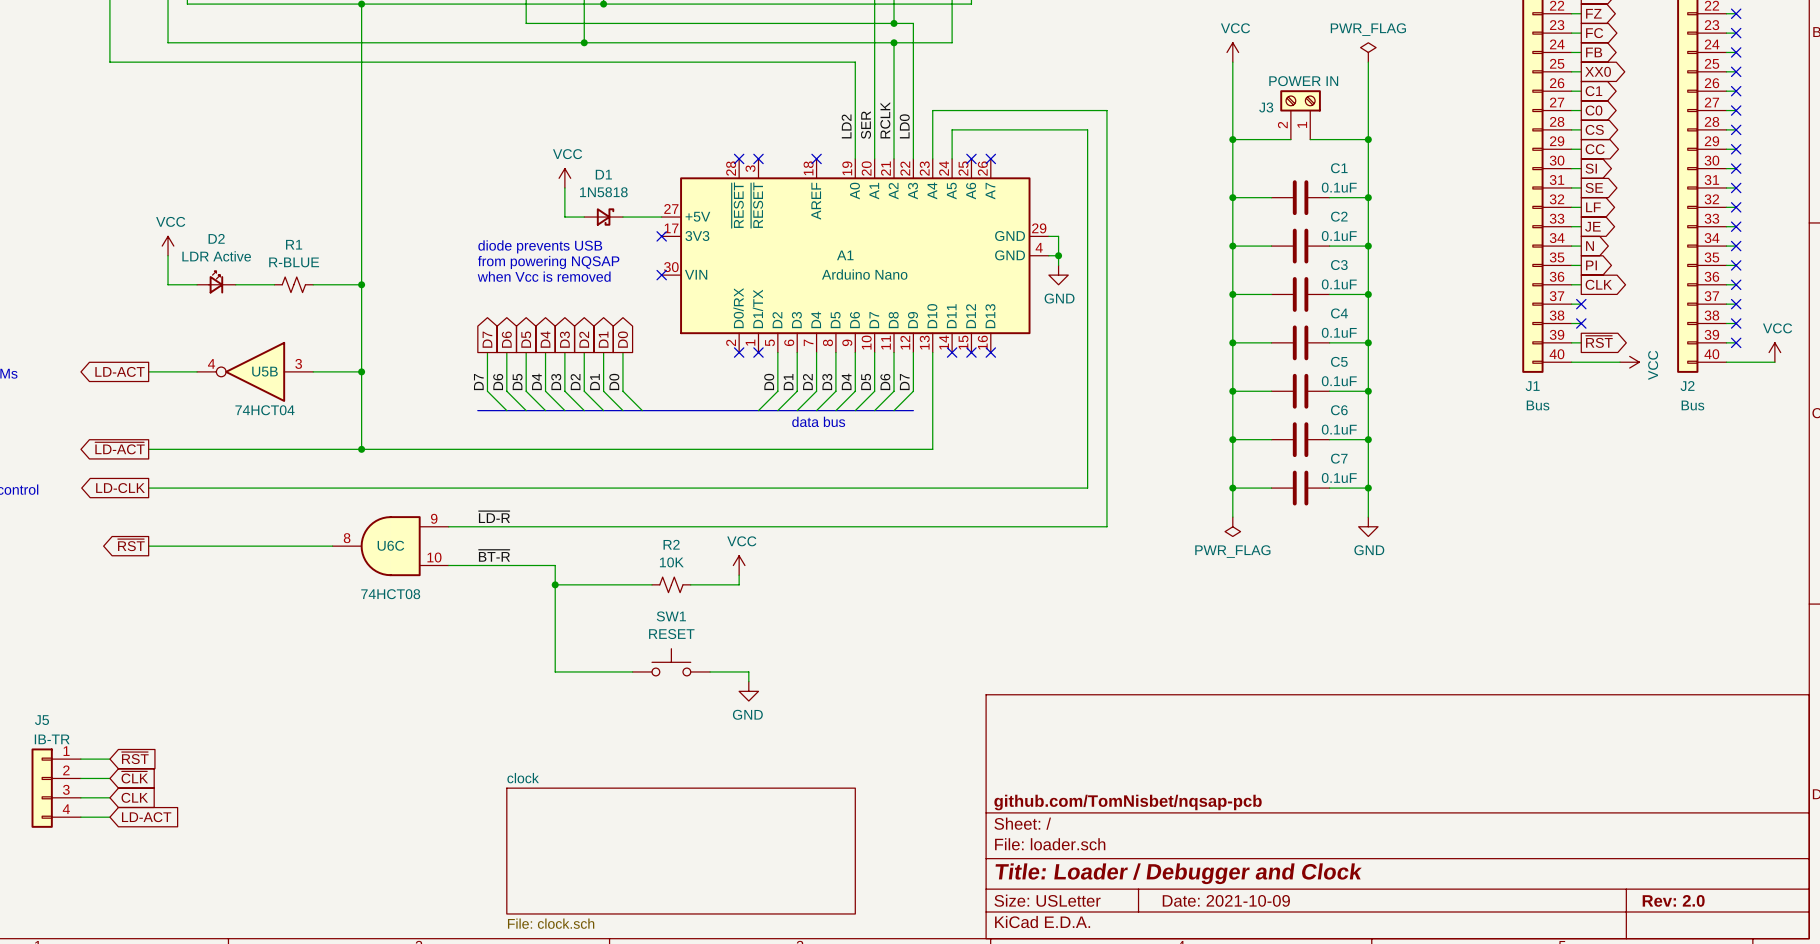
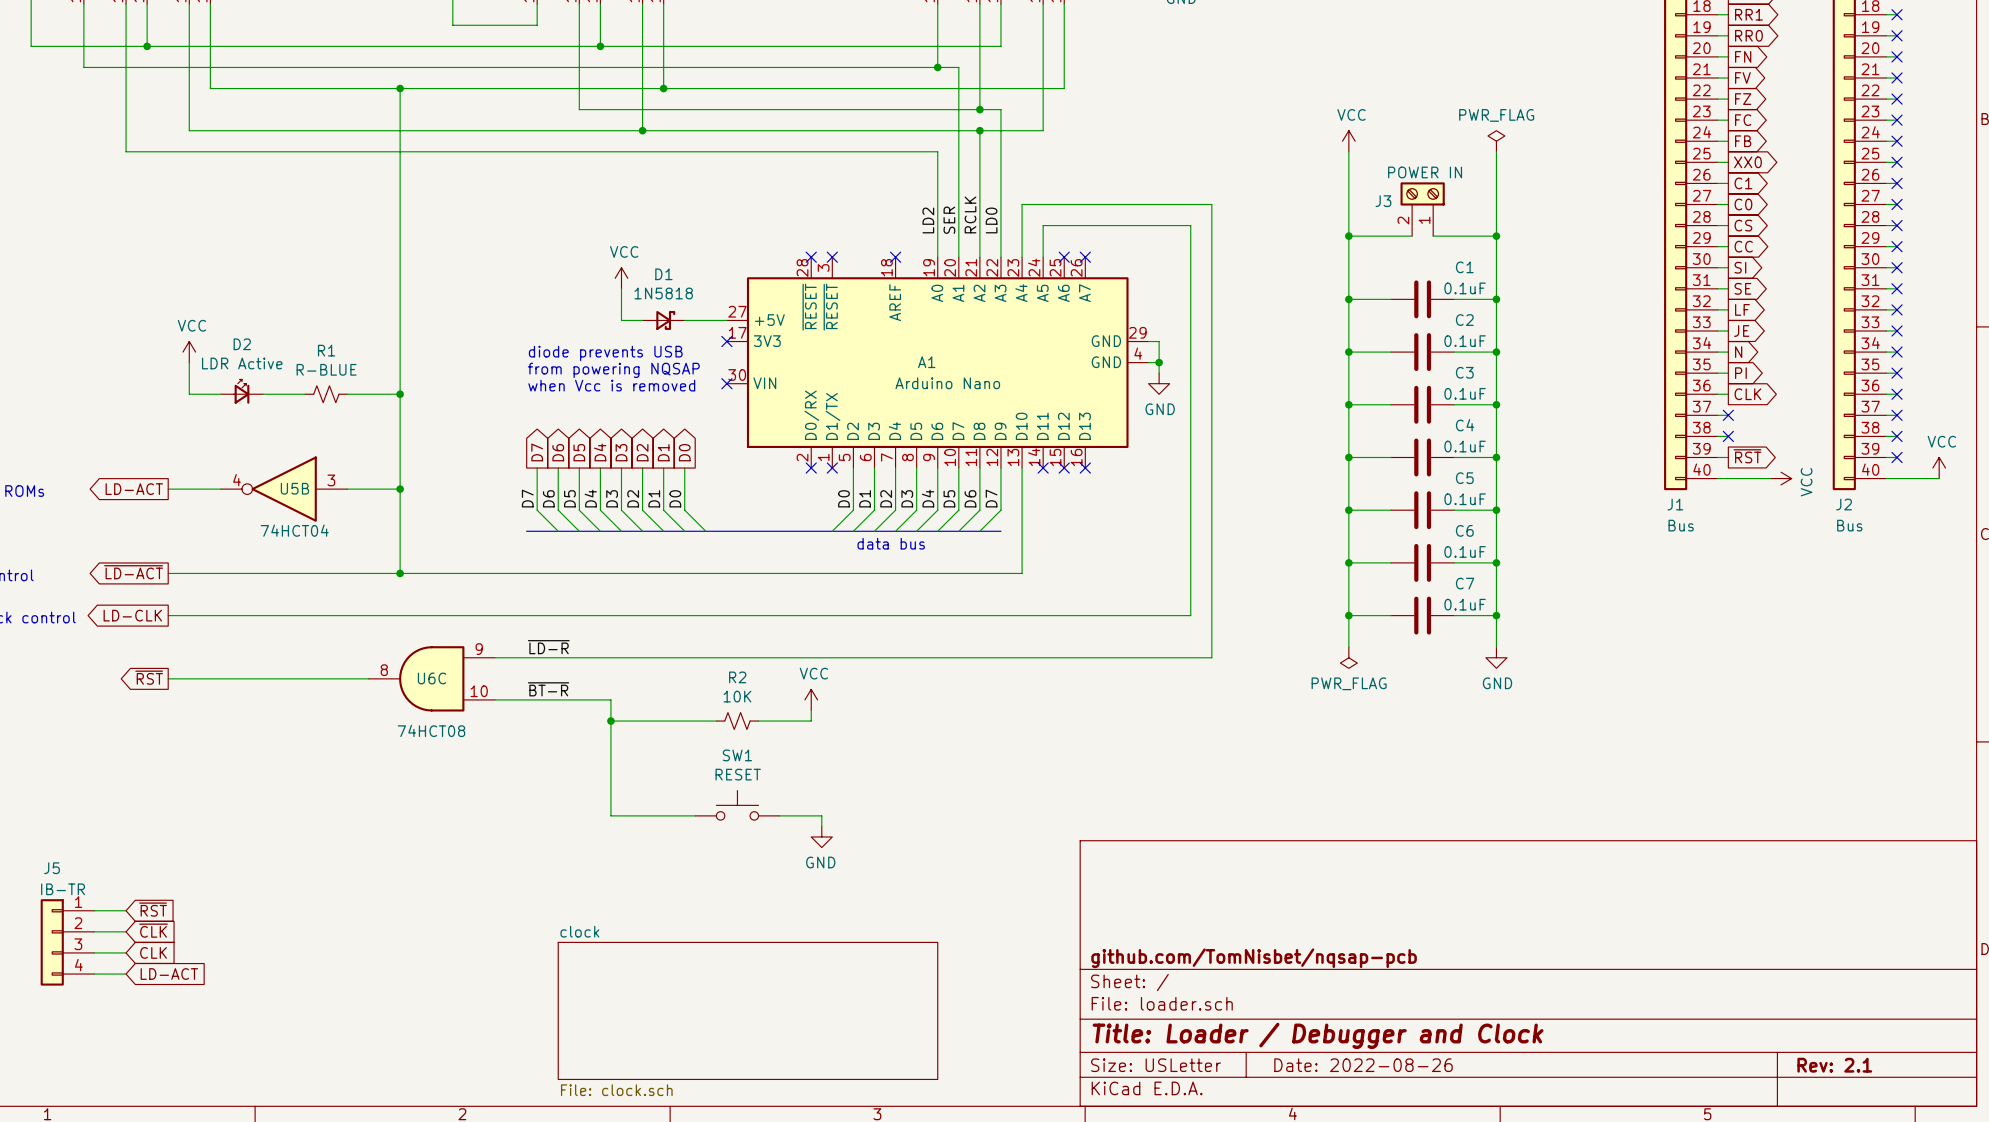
title block: Date: 2021-10-09 (1226, 900) -> Date: 2022-08-26 (1363, 1065)
title block: Rev: 2.0 (1673, 900) -> Rev: 2.1 (1834, 1065)

